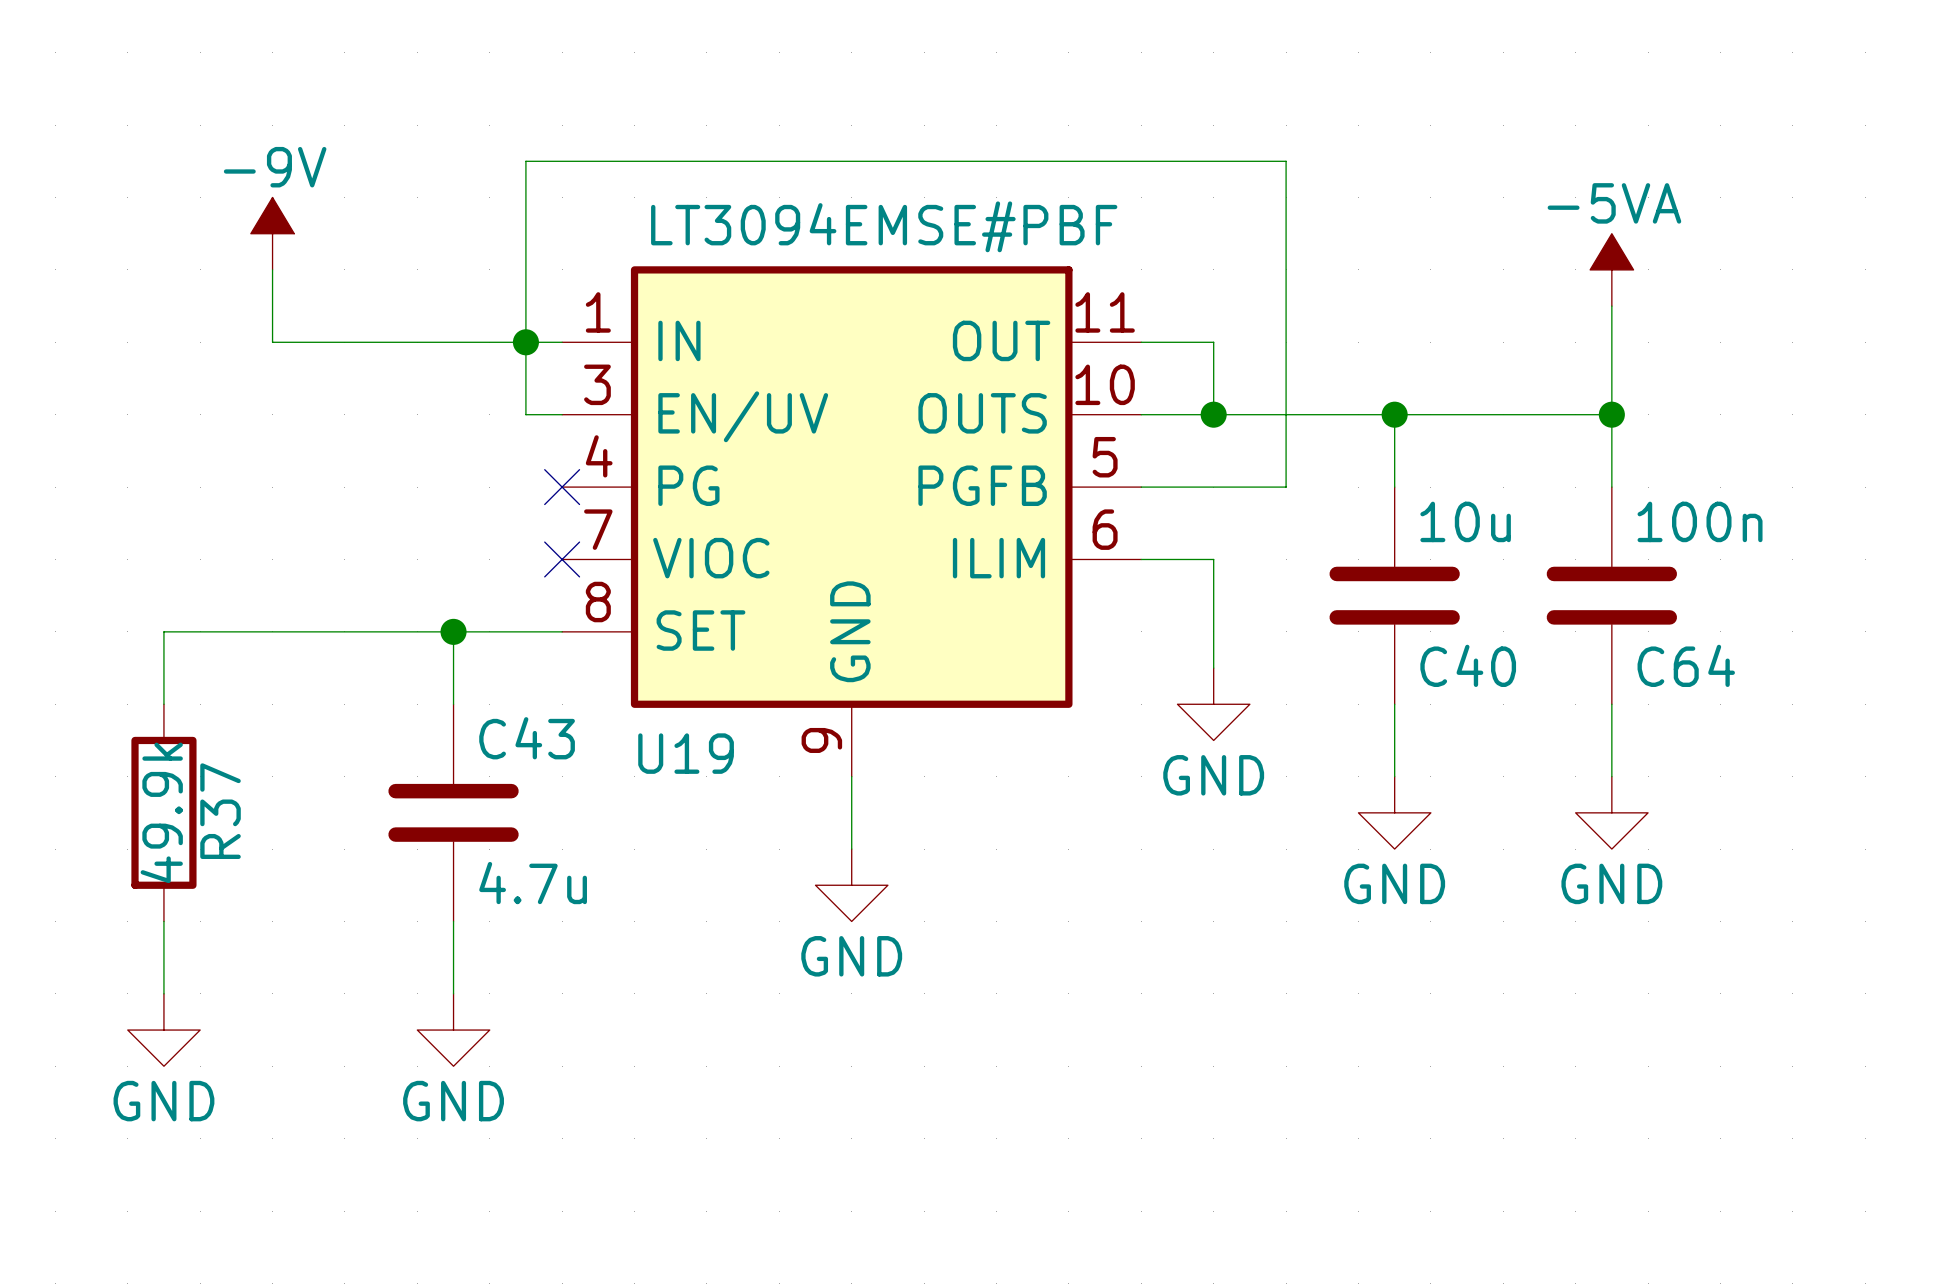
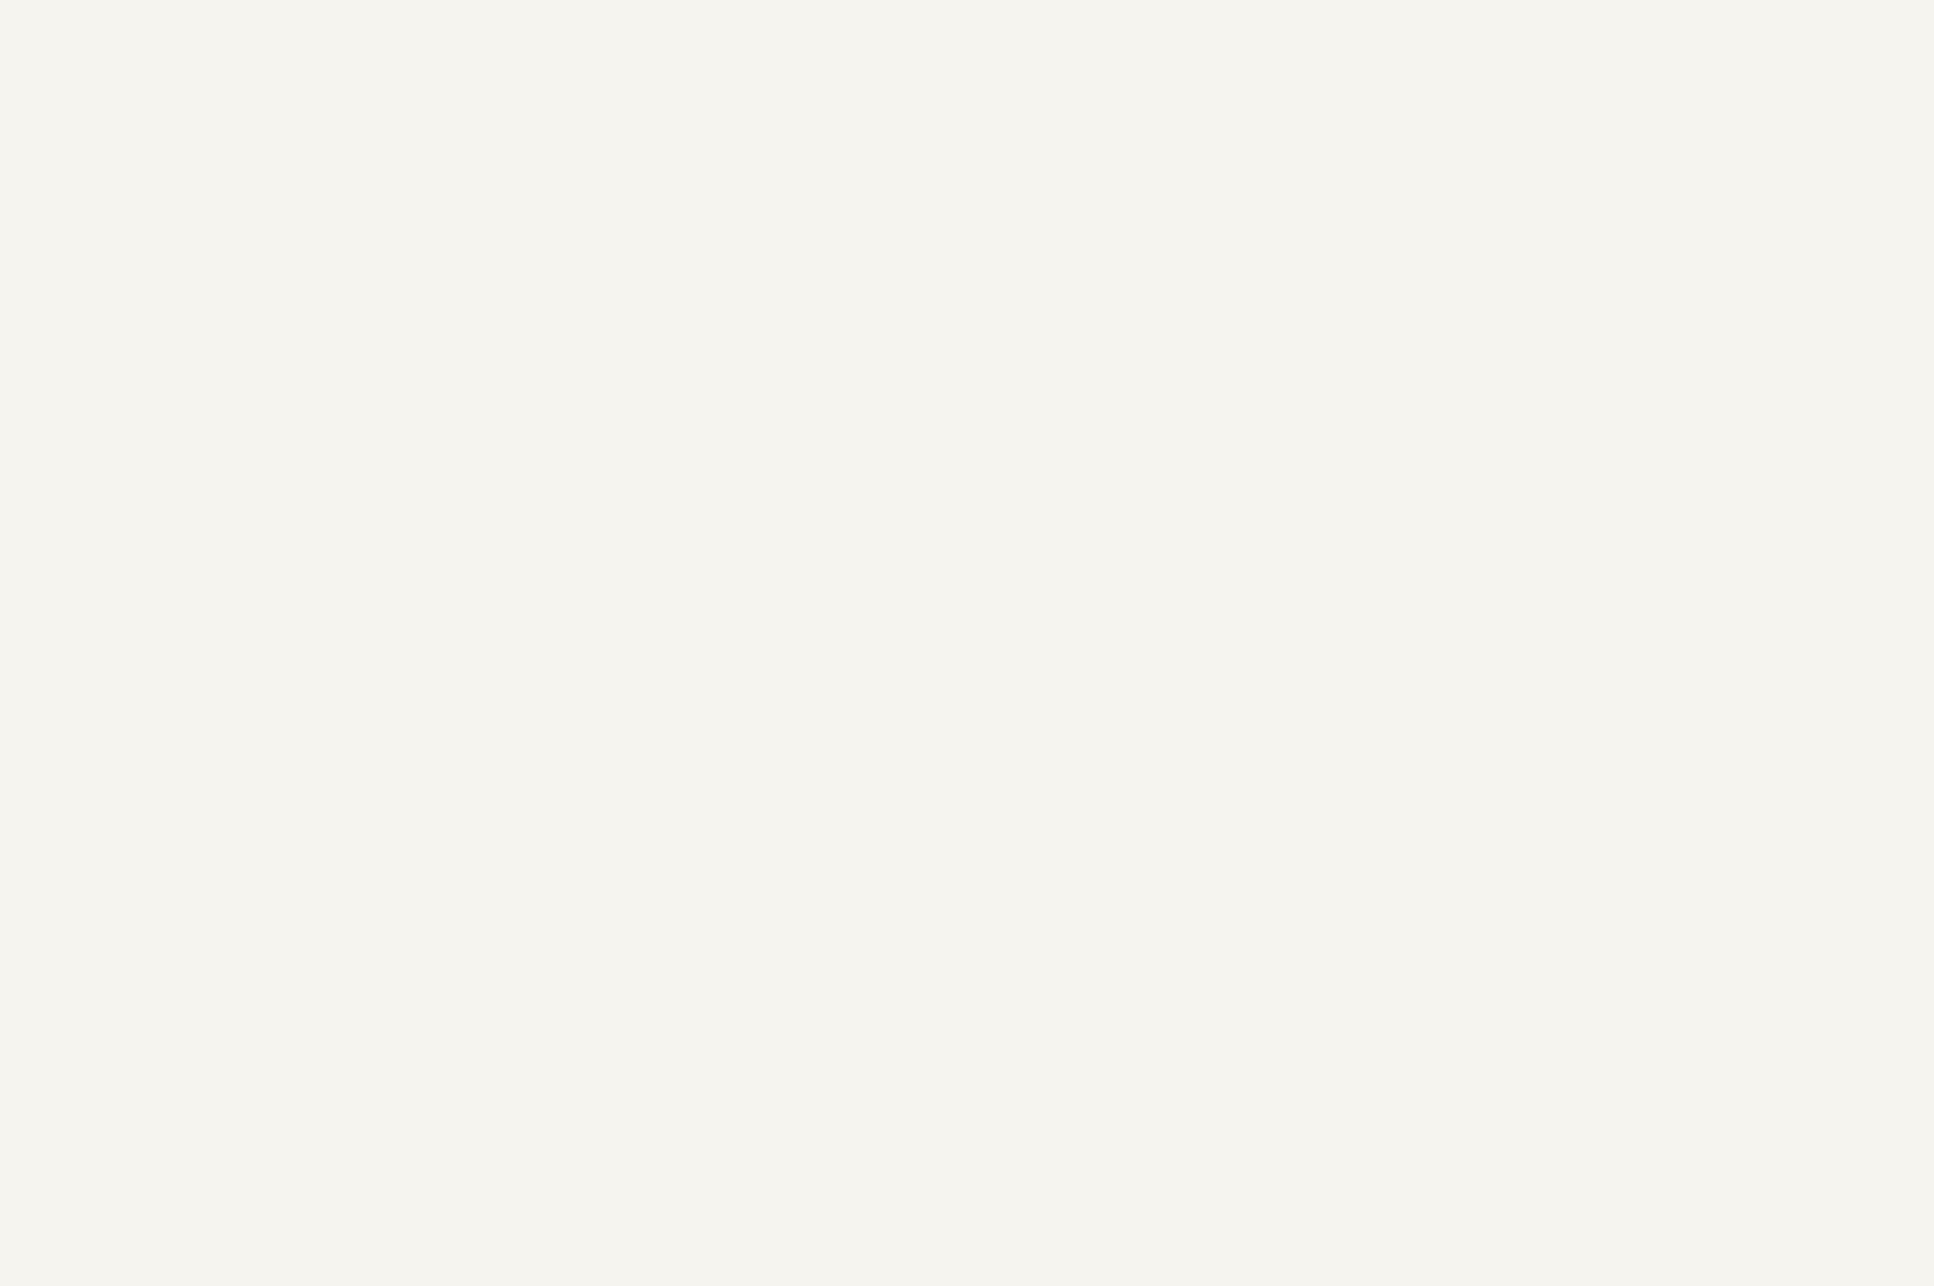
power symbol: -9V (272, 233) -> none
wire: (272, 269) (272, 342) (562, 342) -> none
power symbol: -5VA (1611, 269) -> none
wire: (1611, 306) (1611, 487) -> none
junction: (525, 342) -> none
wire: (1141, 342) (1213, 342) (1213, 414) -> none
wire: (562, 414) (525, 414) (525, 161) (1286, 161) (1286, 487) (1141, 487) -> none
wire: (1141, 414) (1611, 414) -> none
junction: (1213, 414) -> none
wire: (1394, 414) (1394, 487) -> none
junction: (1394, 414) -> none
junction: (1611, 414) -> none
no-connect mark: (562, 487) -> none
U19: LT3094EMSE#PBF (851, 521) -> none
no-connect mark: (562, 559) -> none
wire: (1141, 559) (1213, 559) (1213, 668) -> none
C40: 10u (1394, 595) -> none
C64: 100n (1611, 595) -> none
wire: (453, 631) (453, 704) -> none
junction: (453, 631) -> none
wire: (562, 631) (163, 631) (163, 704) -> none
power symbol: GND (1213, 704) -> none
wire: (1394, 704) (1394, 776) -> none
wire: (1611, 704) (1611, 776) -> none
wire: (851, 776) (851, 849) -> none
R37: 49.9k (163, 812) -> none
C43: 4.7u (453, 812) -> none
power symbol: GND (1394, 812) -> none
power symbol: GND (1611, 812) -> none
power symbol: GND (851, 885) -> none
wire: (163, 921) (163, 993) -> none
wire: (453, 921) (453, 993) -> none
power symbol: GND (163, 1030) -> none
power symbol: GND (453, 1030) -> none

